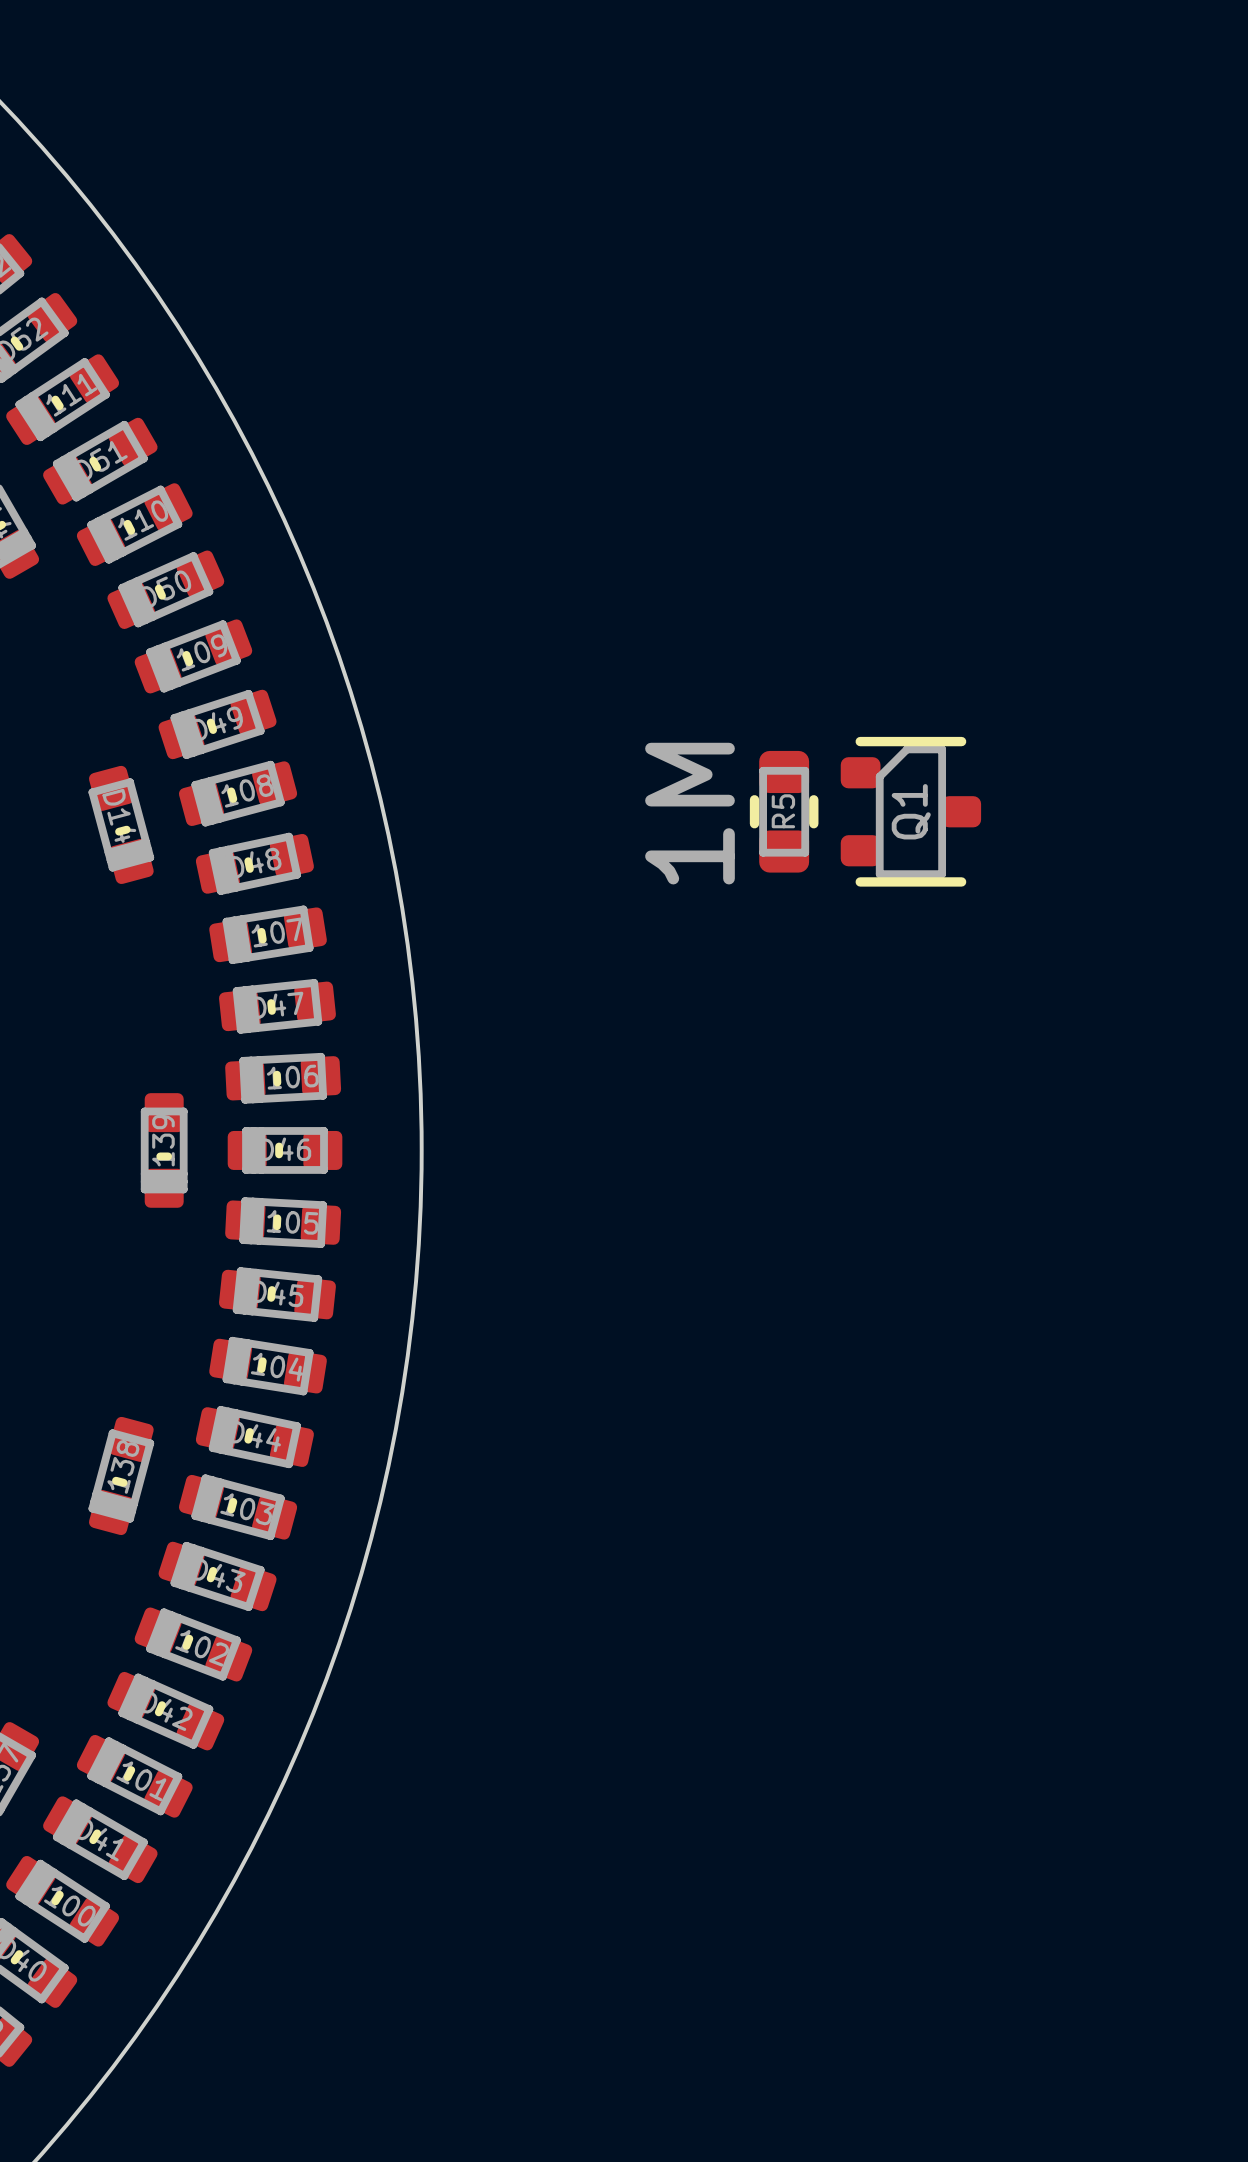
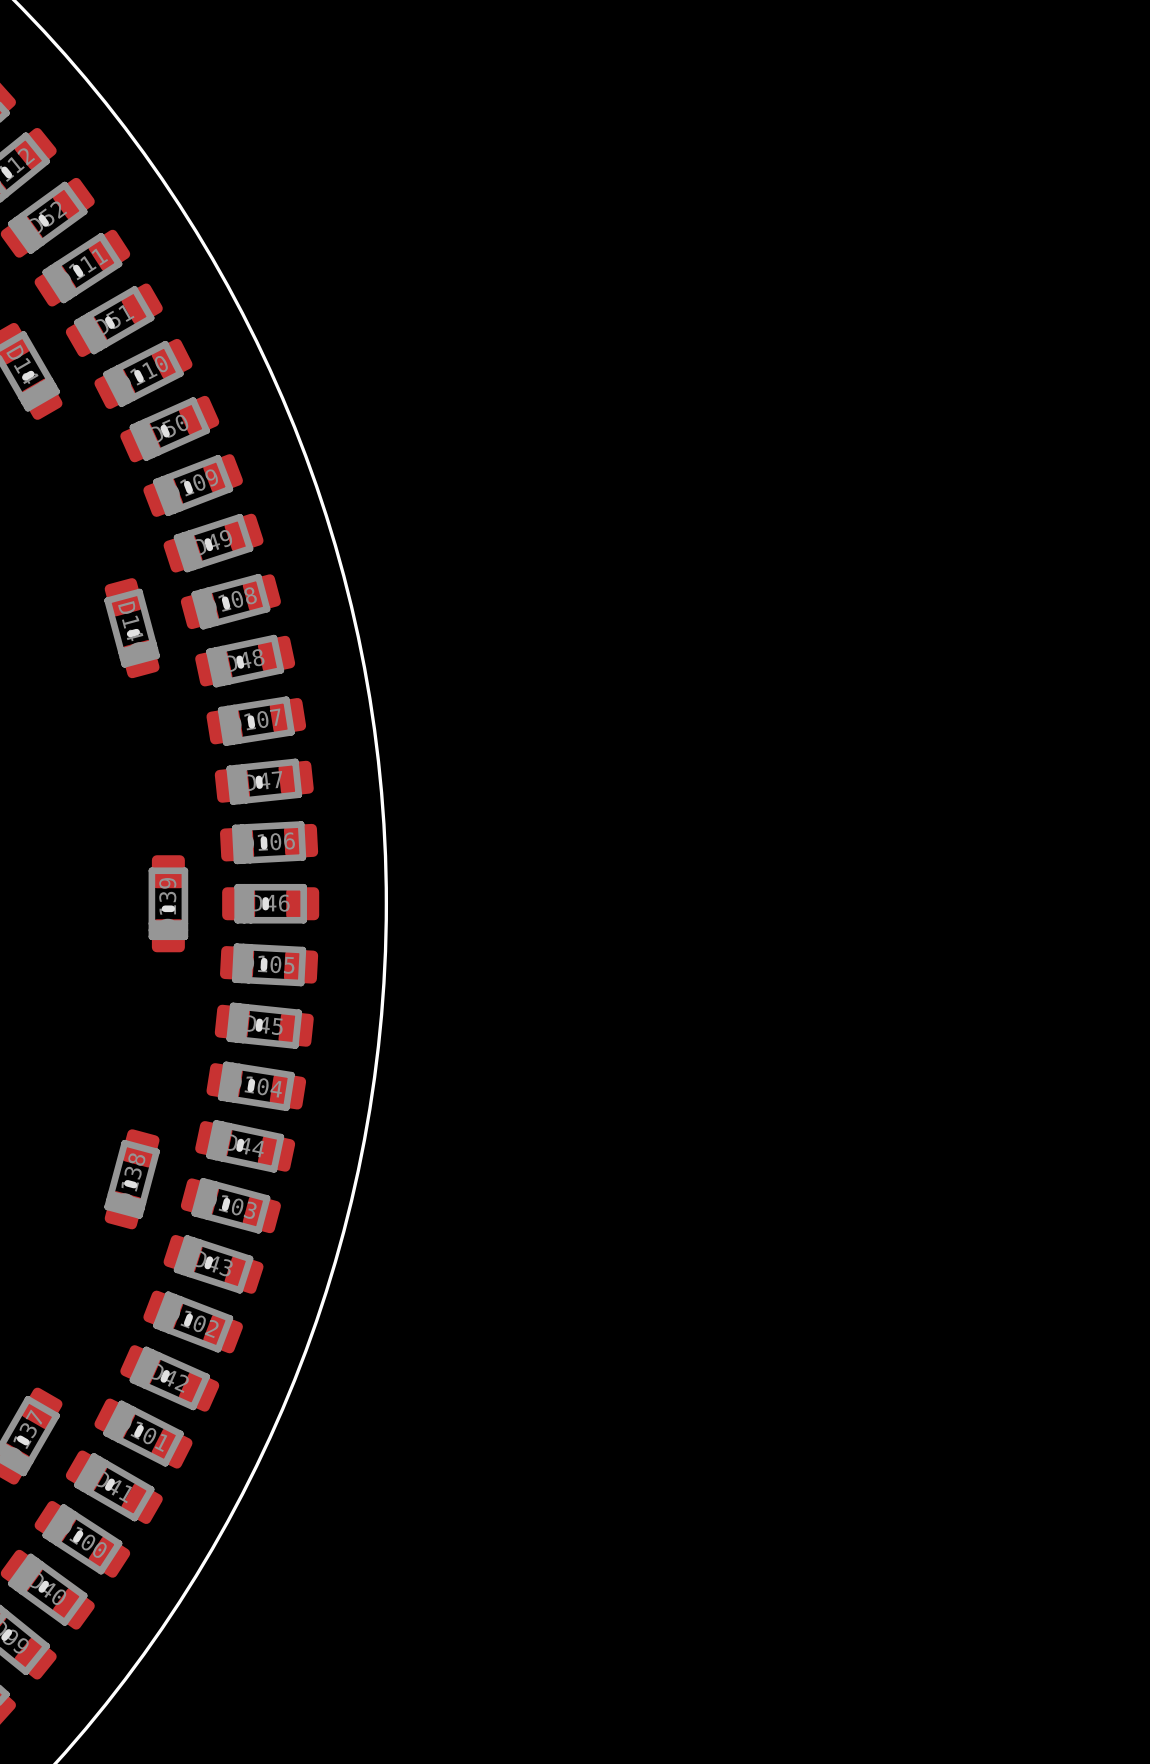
R5: 1M (784, 811) -> none
Q1: (910, 811) -> none

